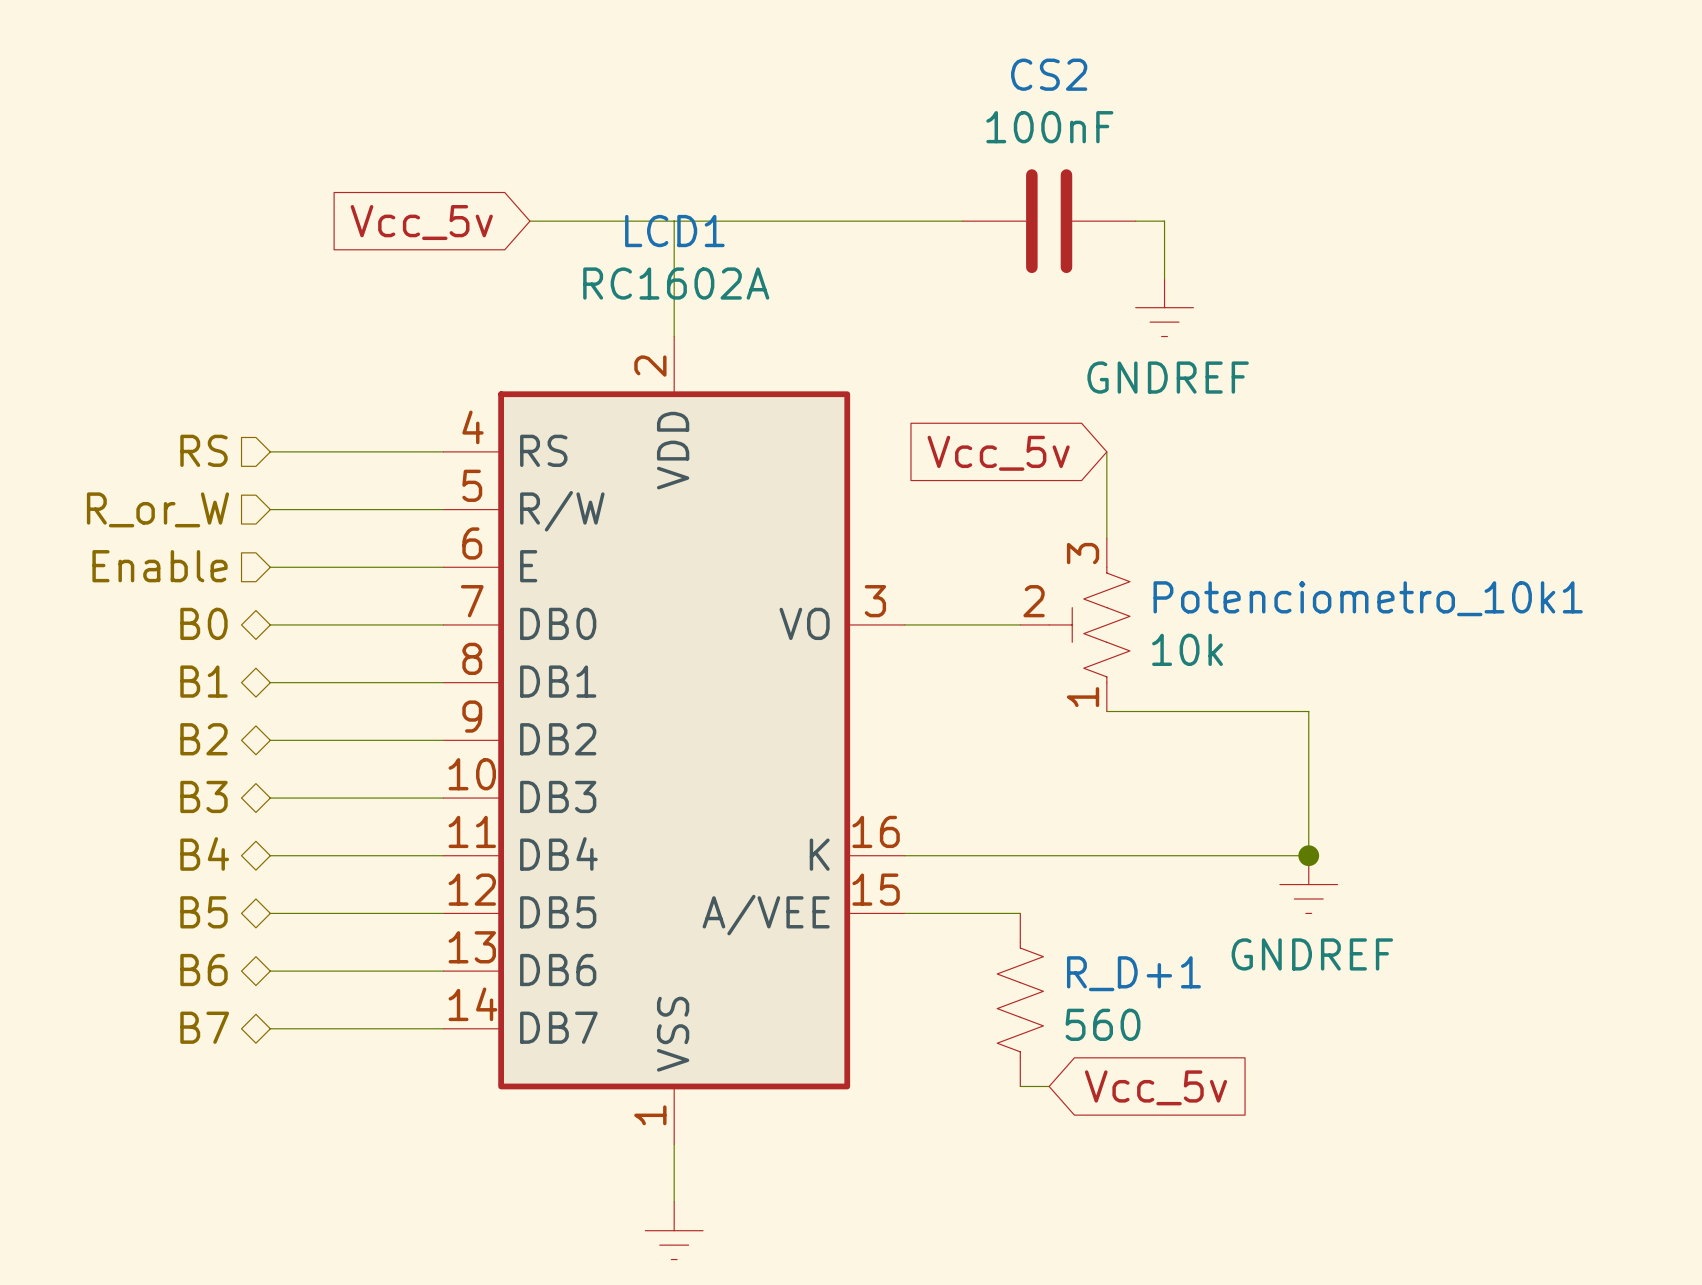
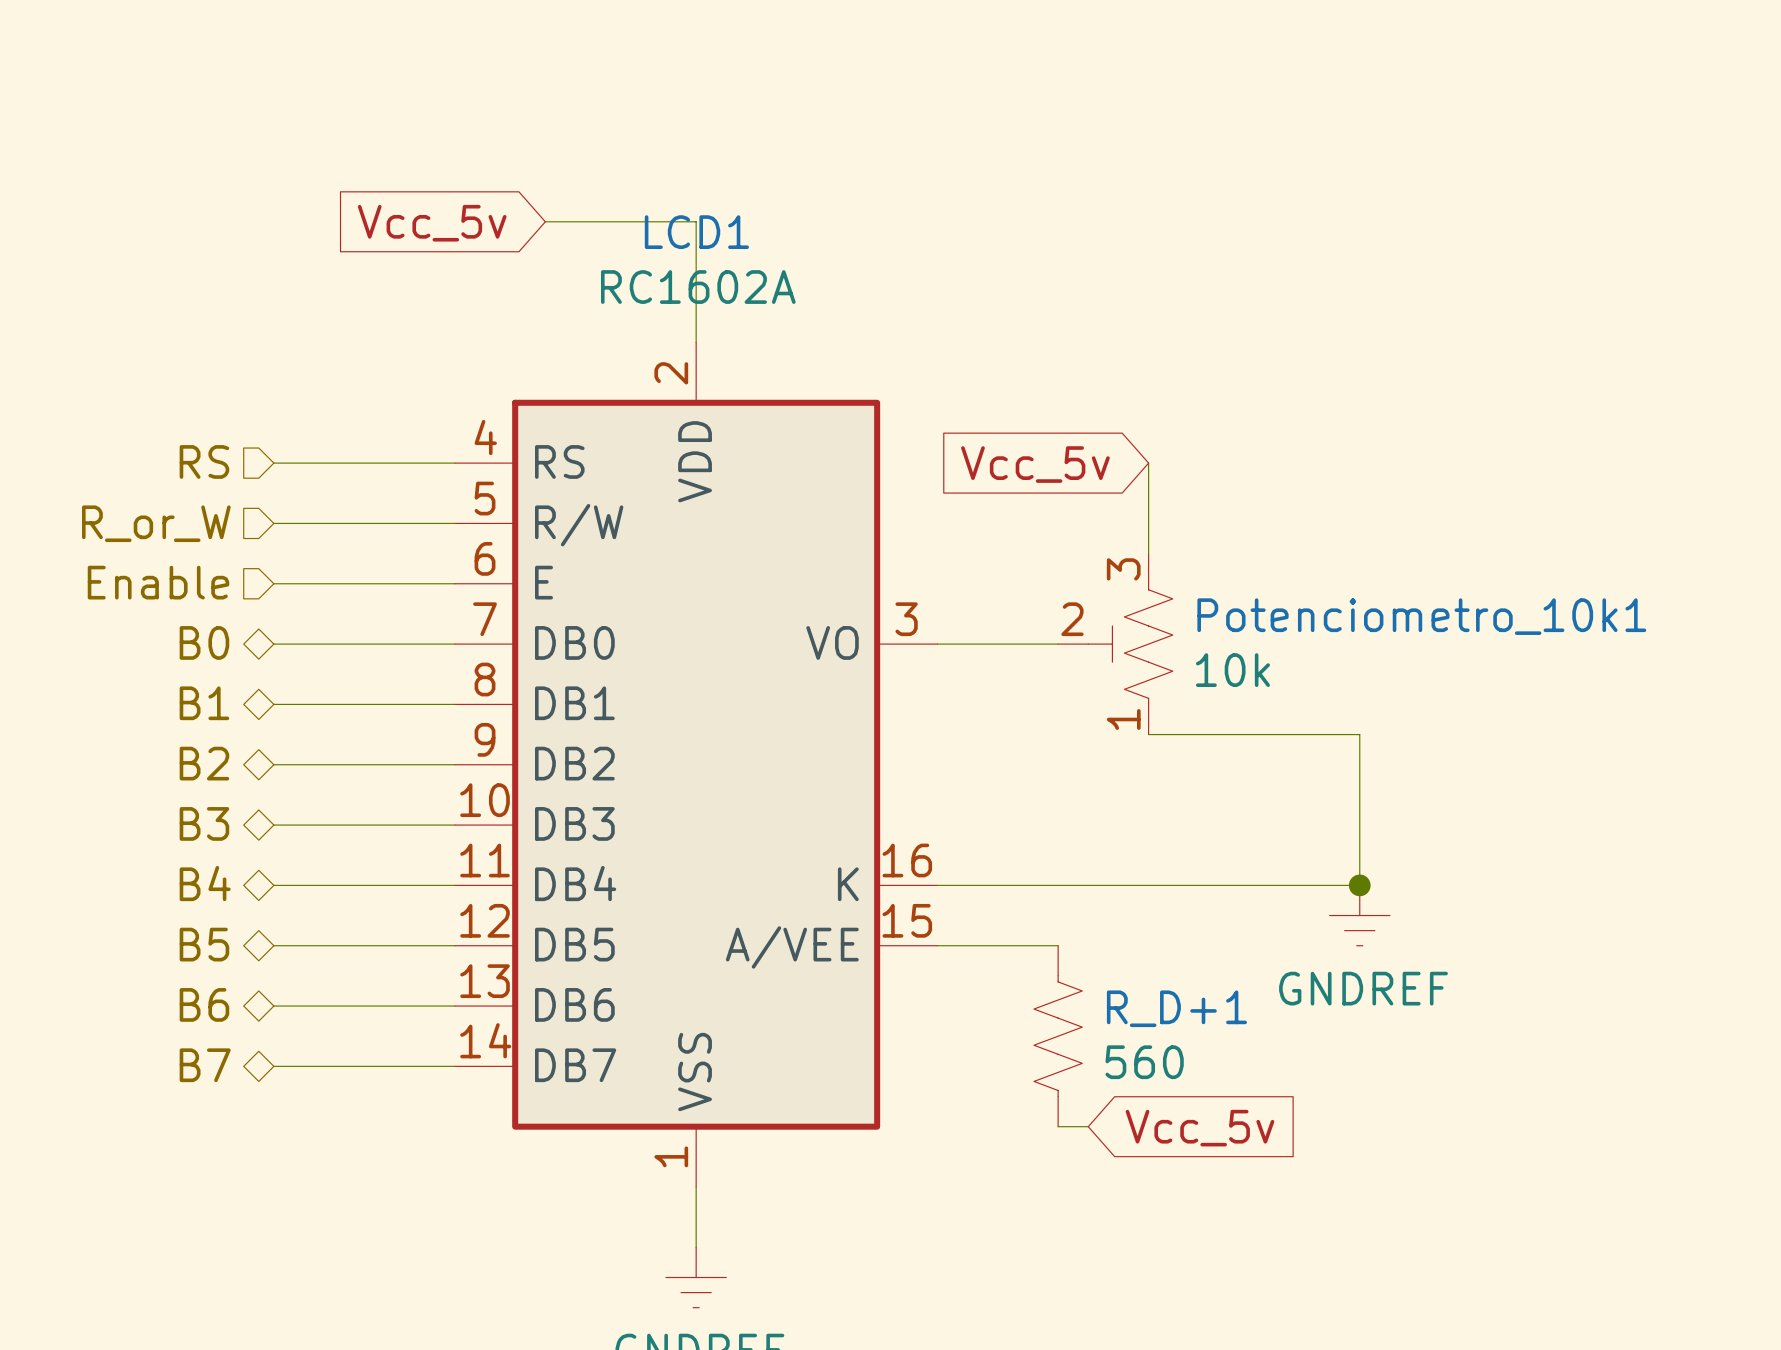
wire: (674, 221) (962, 221) -> none
CS2: 100nF (1049, 221) -> none
wire: (1135, 221) (1164, 221) (1164, 278) -> none
power symbol: GNDREF (1164, 307) -> none

